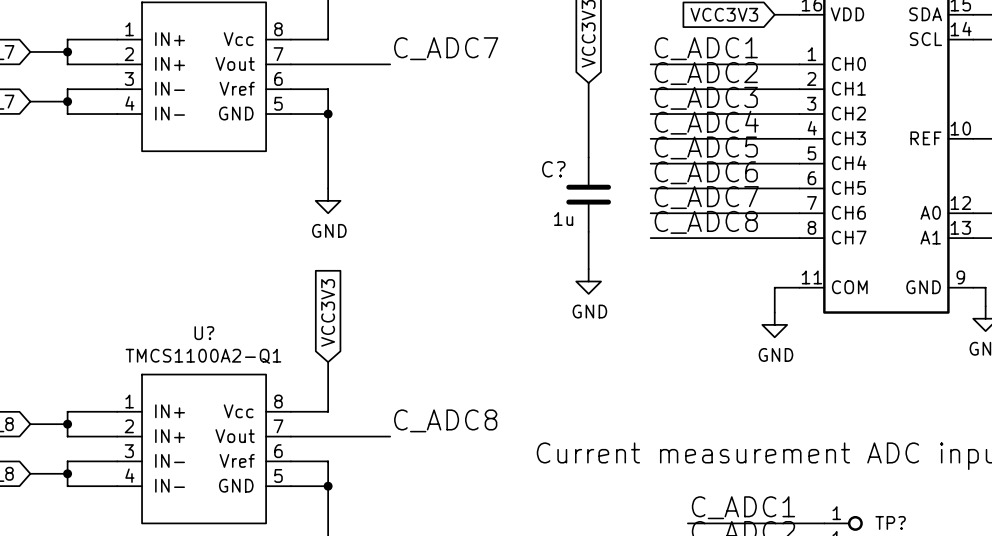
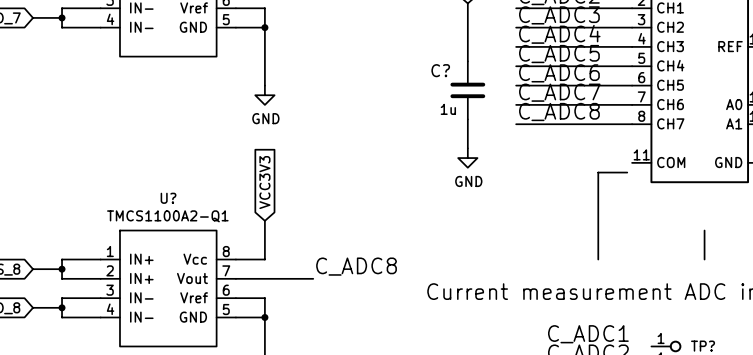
wire: (799, 287) (774, 287) (774, 312) -> none
wire: none -> (627, 172) (598, 172) (598, 259)
power symbol: GND (774, 324) -> none
wire: none -> (704, 230) (704, 259)
wire: (687, 523) (824, 523) -> none

